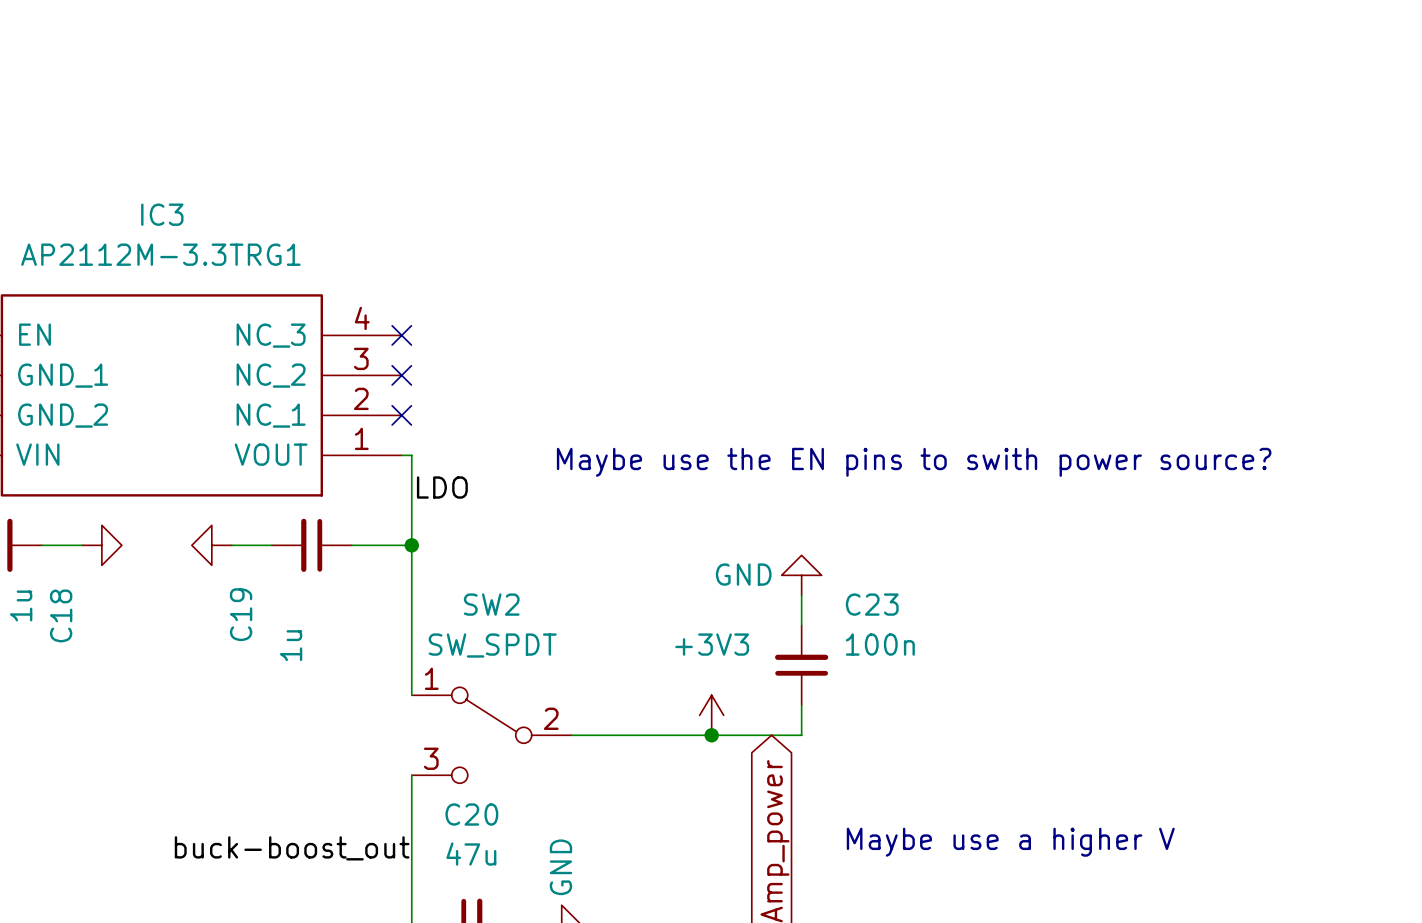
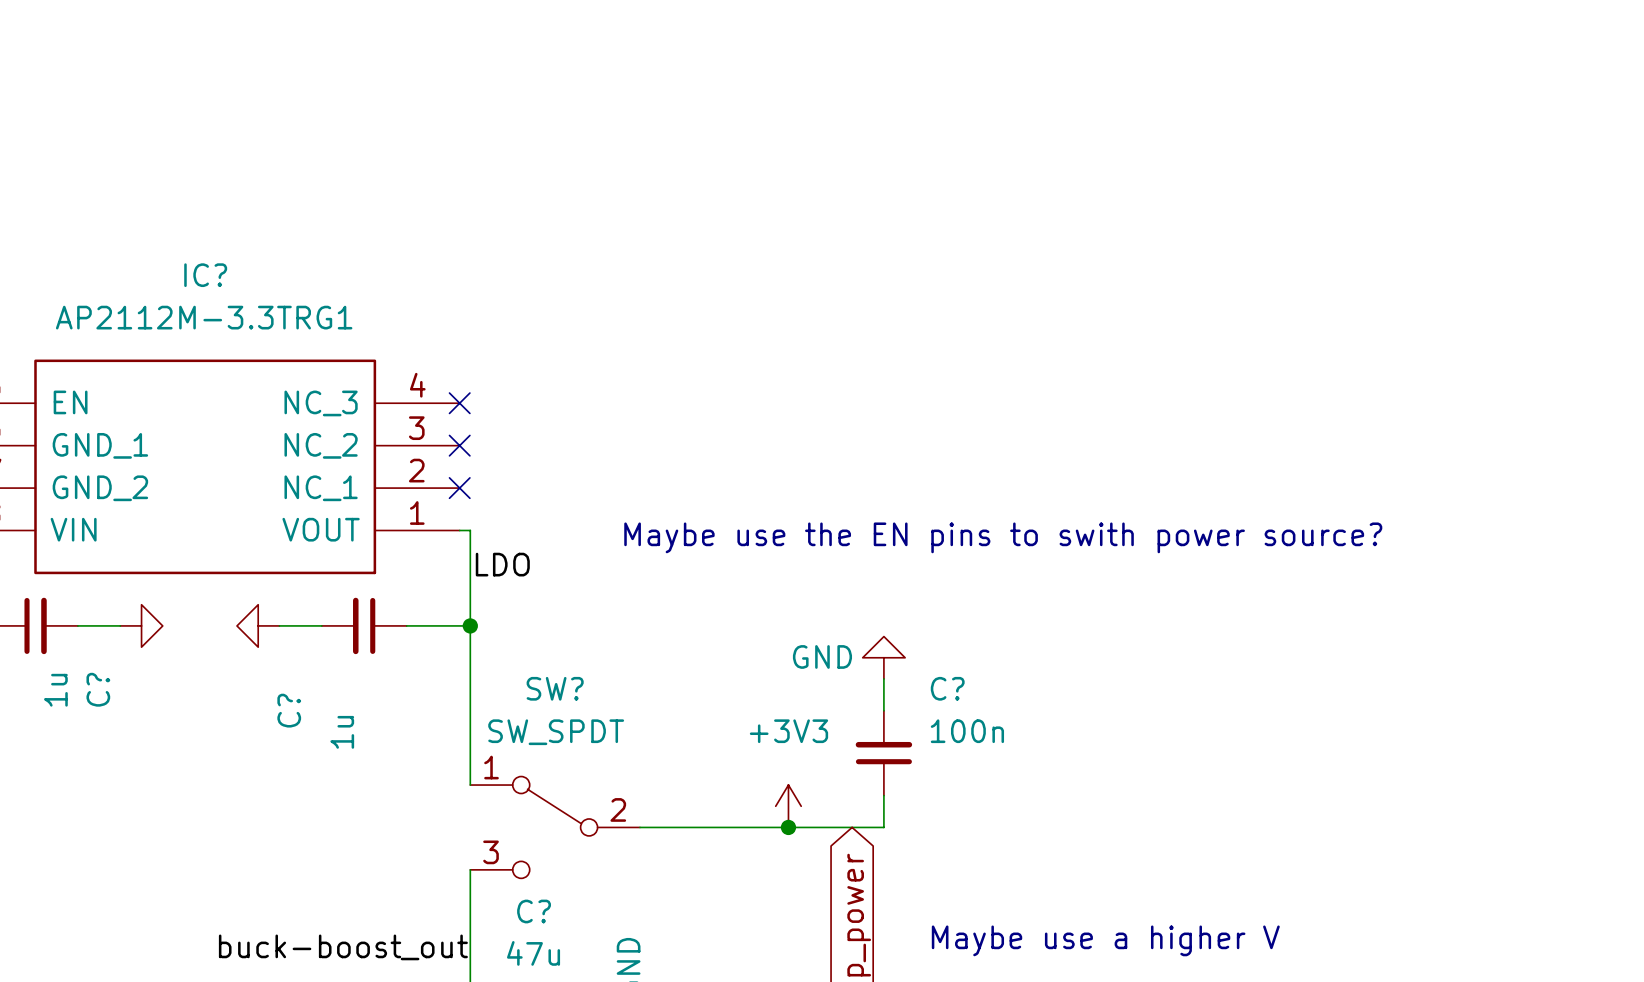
IC3 name: IC3 (162, 214) -> IC? (205, 275)
SW2 name: SW2 (491, 604) -> SW? (555, 688)
C23 name: C23 (872, 604) -> C? (947, 688)
C19 name: C19 (241, 614) -> C? (289, 710)
C18 name: C18 (61, 615) -> C? (98, 689)
C20 name: C20 (471, 814) -> C? (534, 911)

